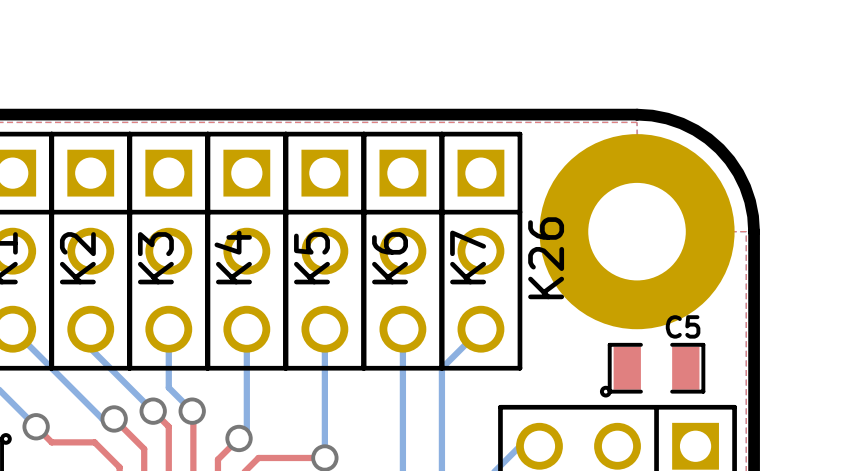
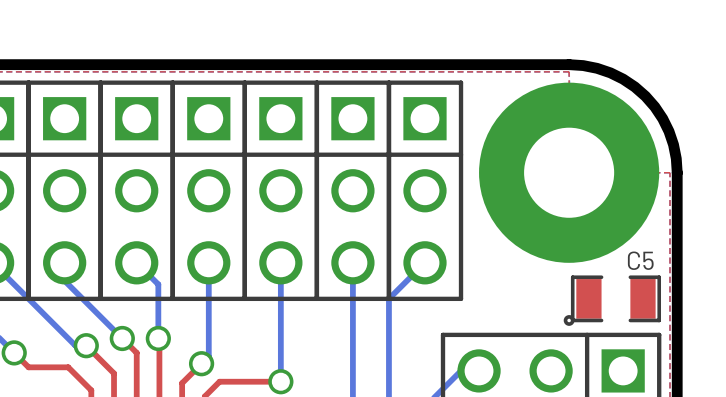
K4 name: K4 (233, 257) -> none
K7 name: K7 (468, 257) -> none
K2 name: K2 (77, 258) -> none
K3 name: K3 (155, 258) -> none
K5 name: K5 (311, 258) -> none
K6 name: K6 (390, 258) -> none
K26 name: K26 (546, 258) -> none
bottom track: (168, 329) (168, 387) (192, 411) -> (136, 262) (158, 284) (158, 338)
C5 position: (652, 370) -> (612, 300)

